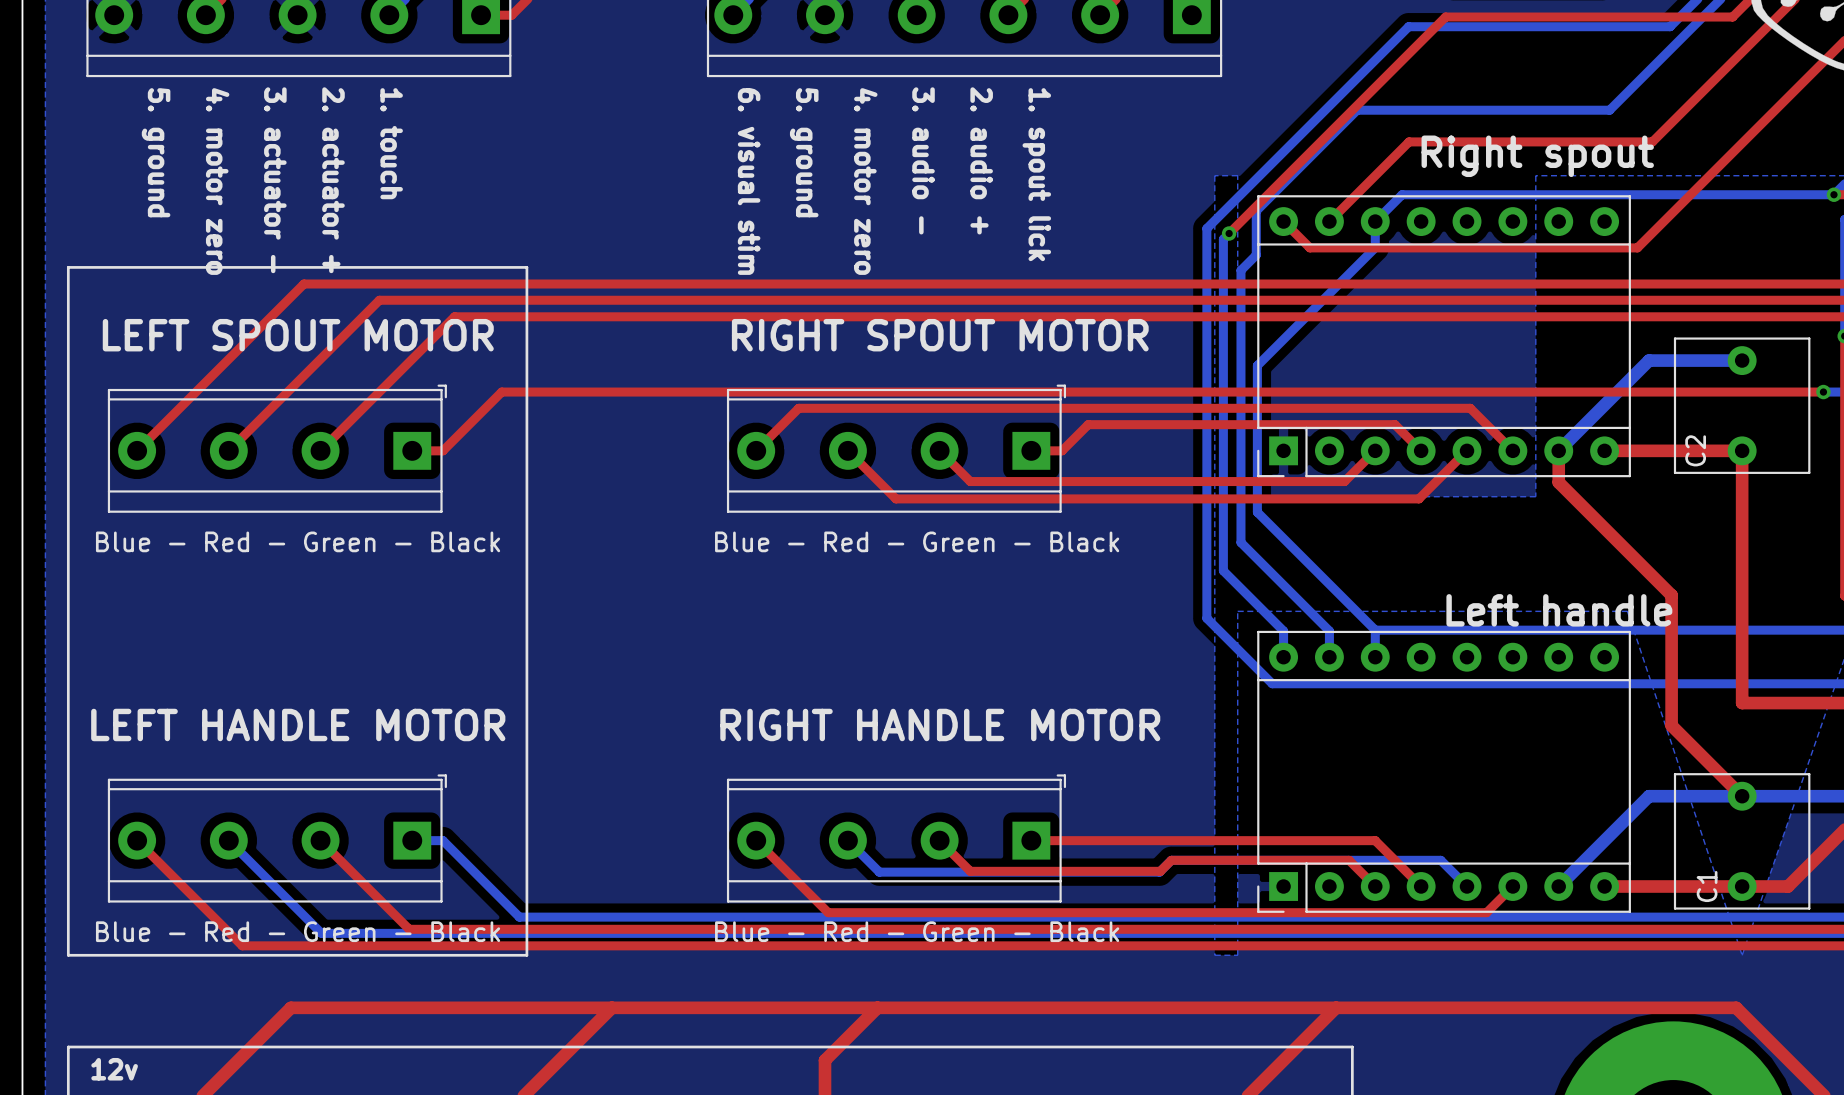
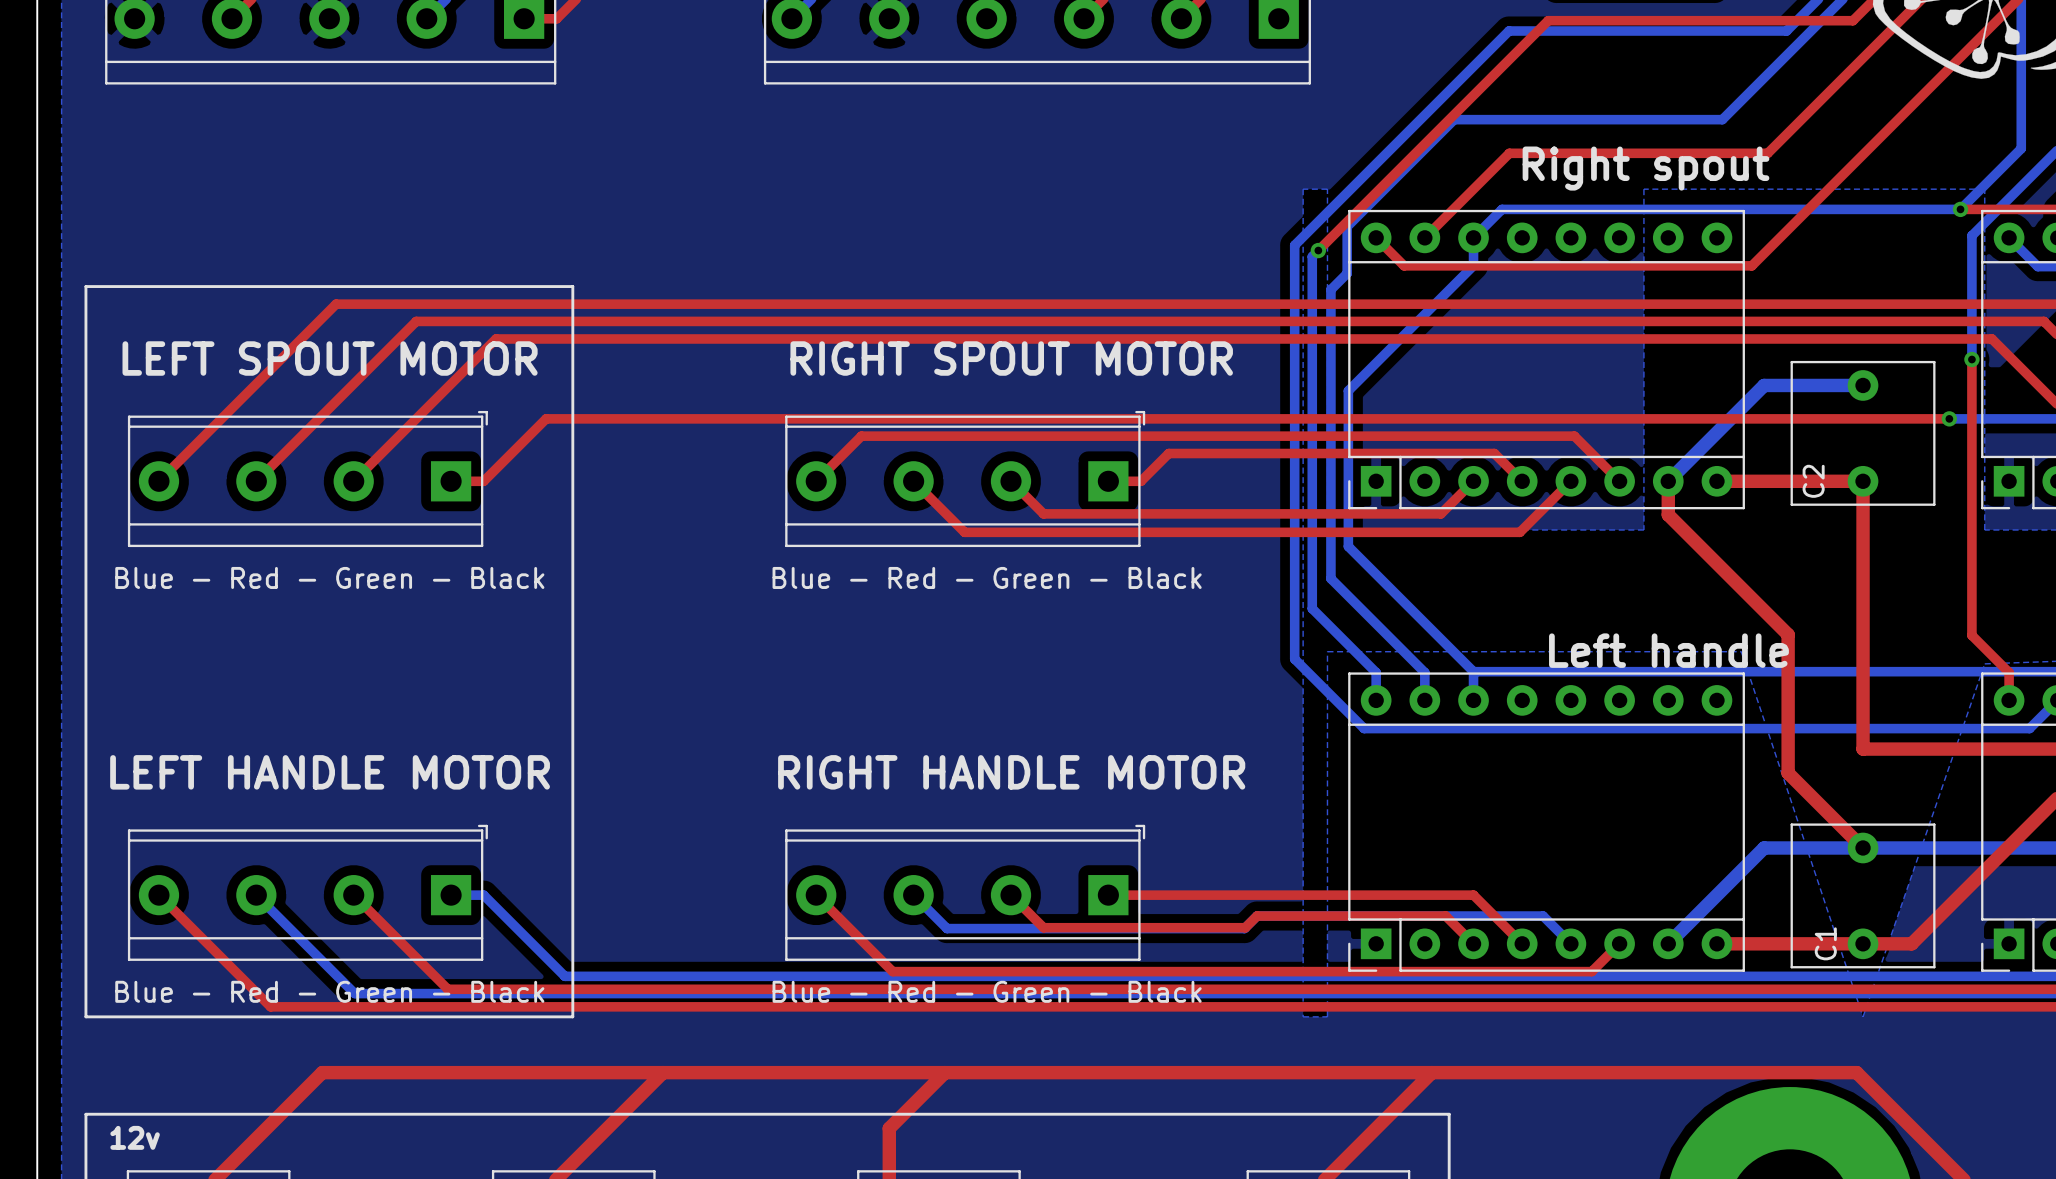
text: 1. touch (391, 143) -> none
text: 5. ground (156, 152) -> none
text: 5. ground (804, 152) -> none
text: 3. audio - (923, 160) -> none
text: 2. audio + (981, 160) -> none
text: 1. spout lick (1036, 174) -> none
text: 3. actuator - (275, 180) -> none
text: 2. actuator + (333, 180) -> none
text: 4. motor zero (217, 181) -> none
text: 6. visual stim (749, 181) -> none
text: 4. motor zero (865, 181) -> none

